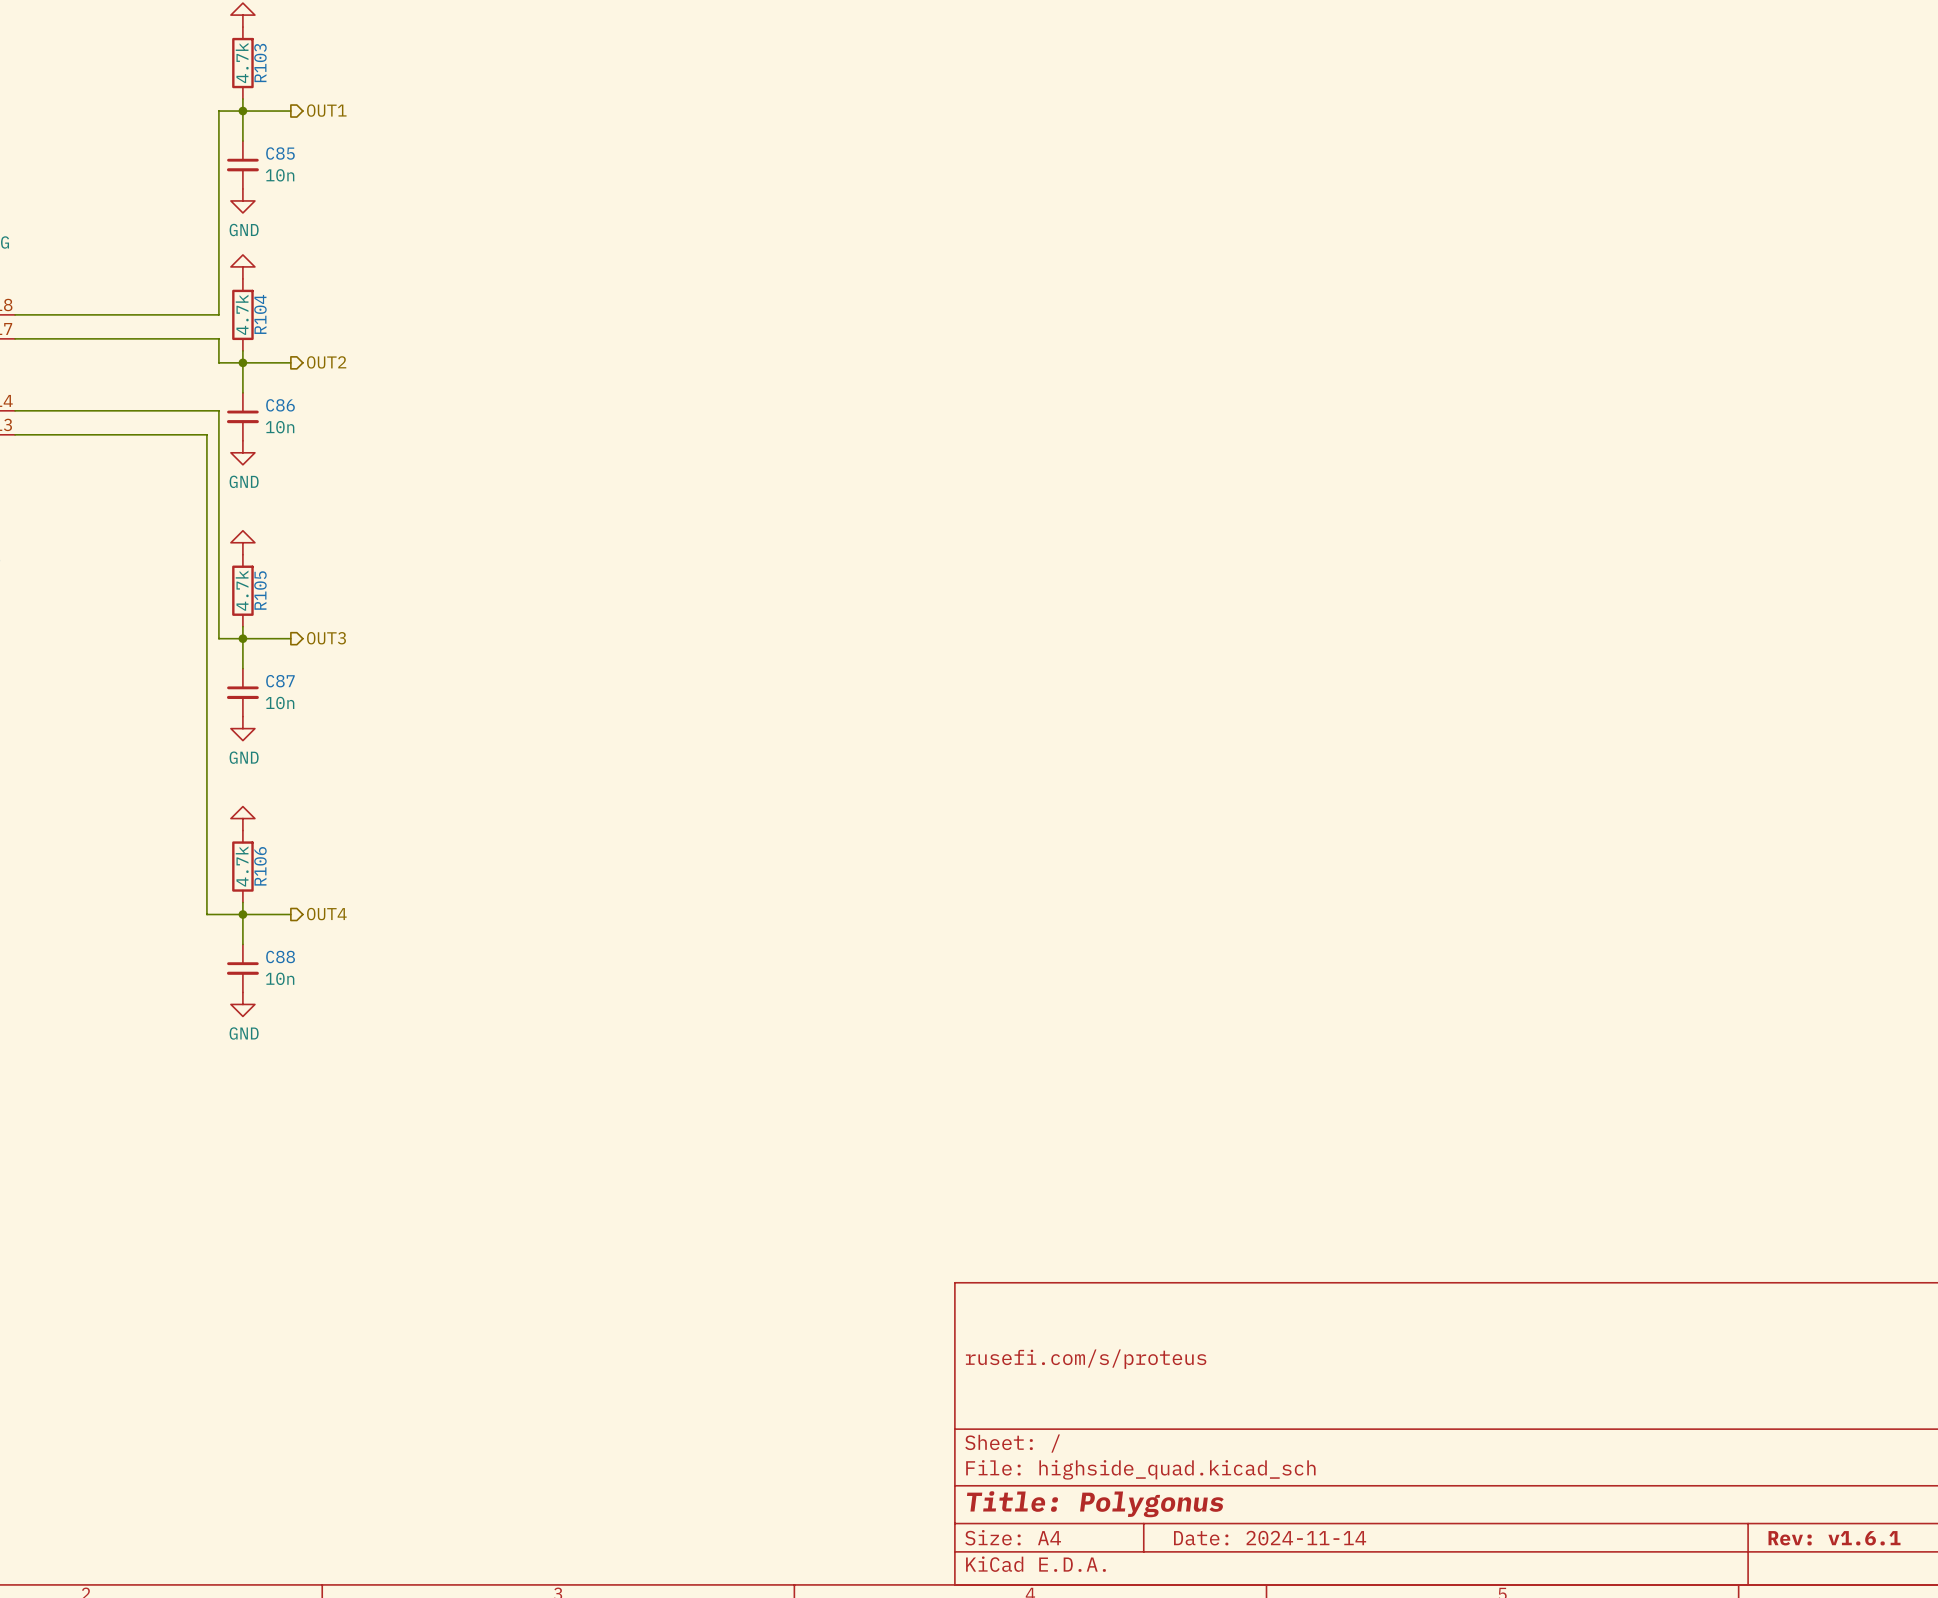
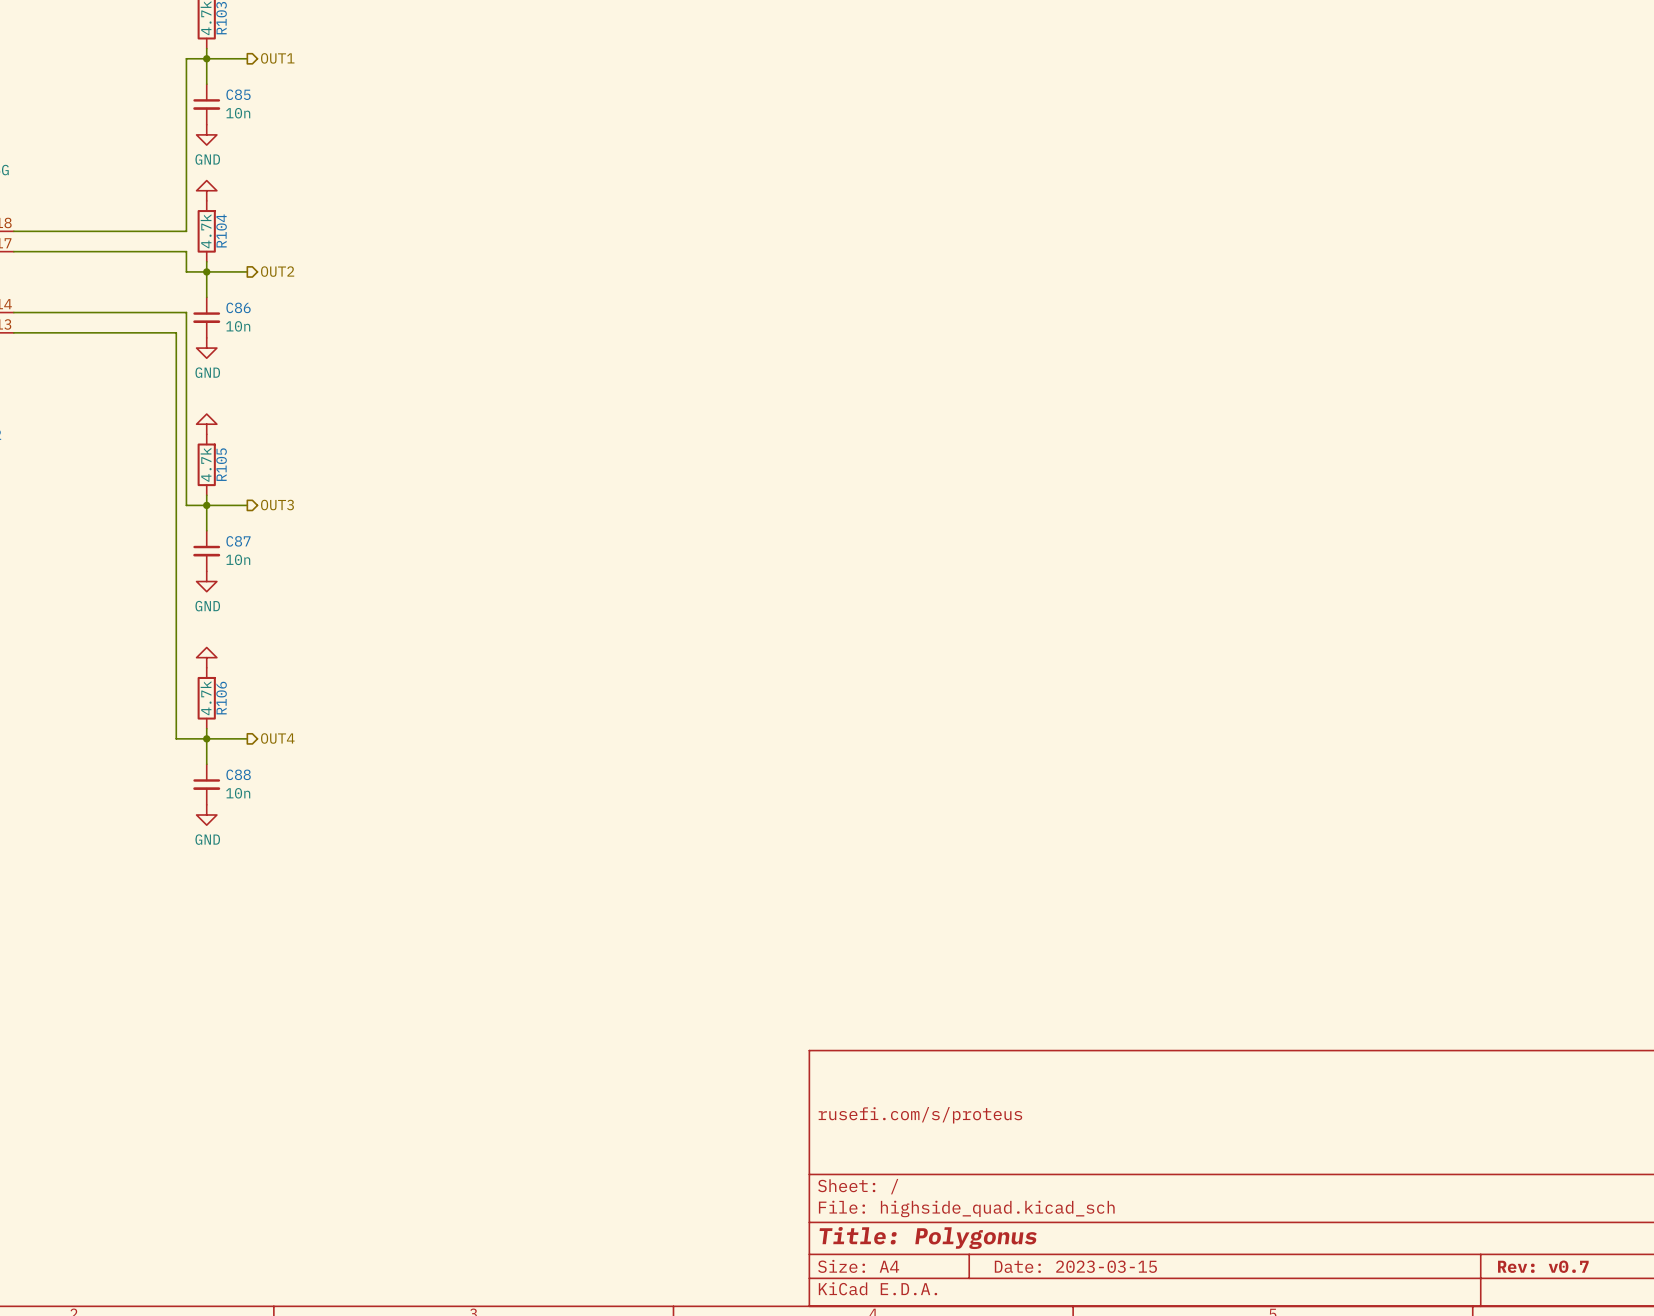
title block: Date: 2024-11-14 (1270, 1538) -> Date: 2023-03-15 (1075, 1266)
title block: Rev: v1.6.1 (1834, 1538) -> Rev: v0.7 (1543, 1266)

